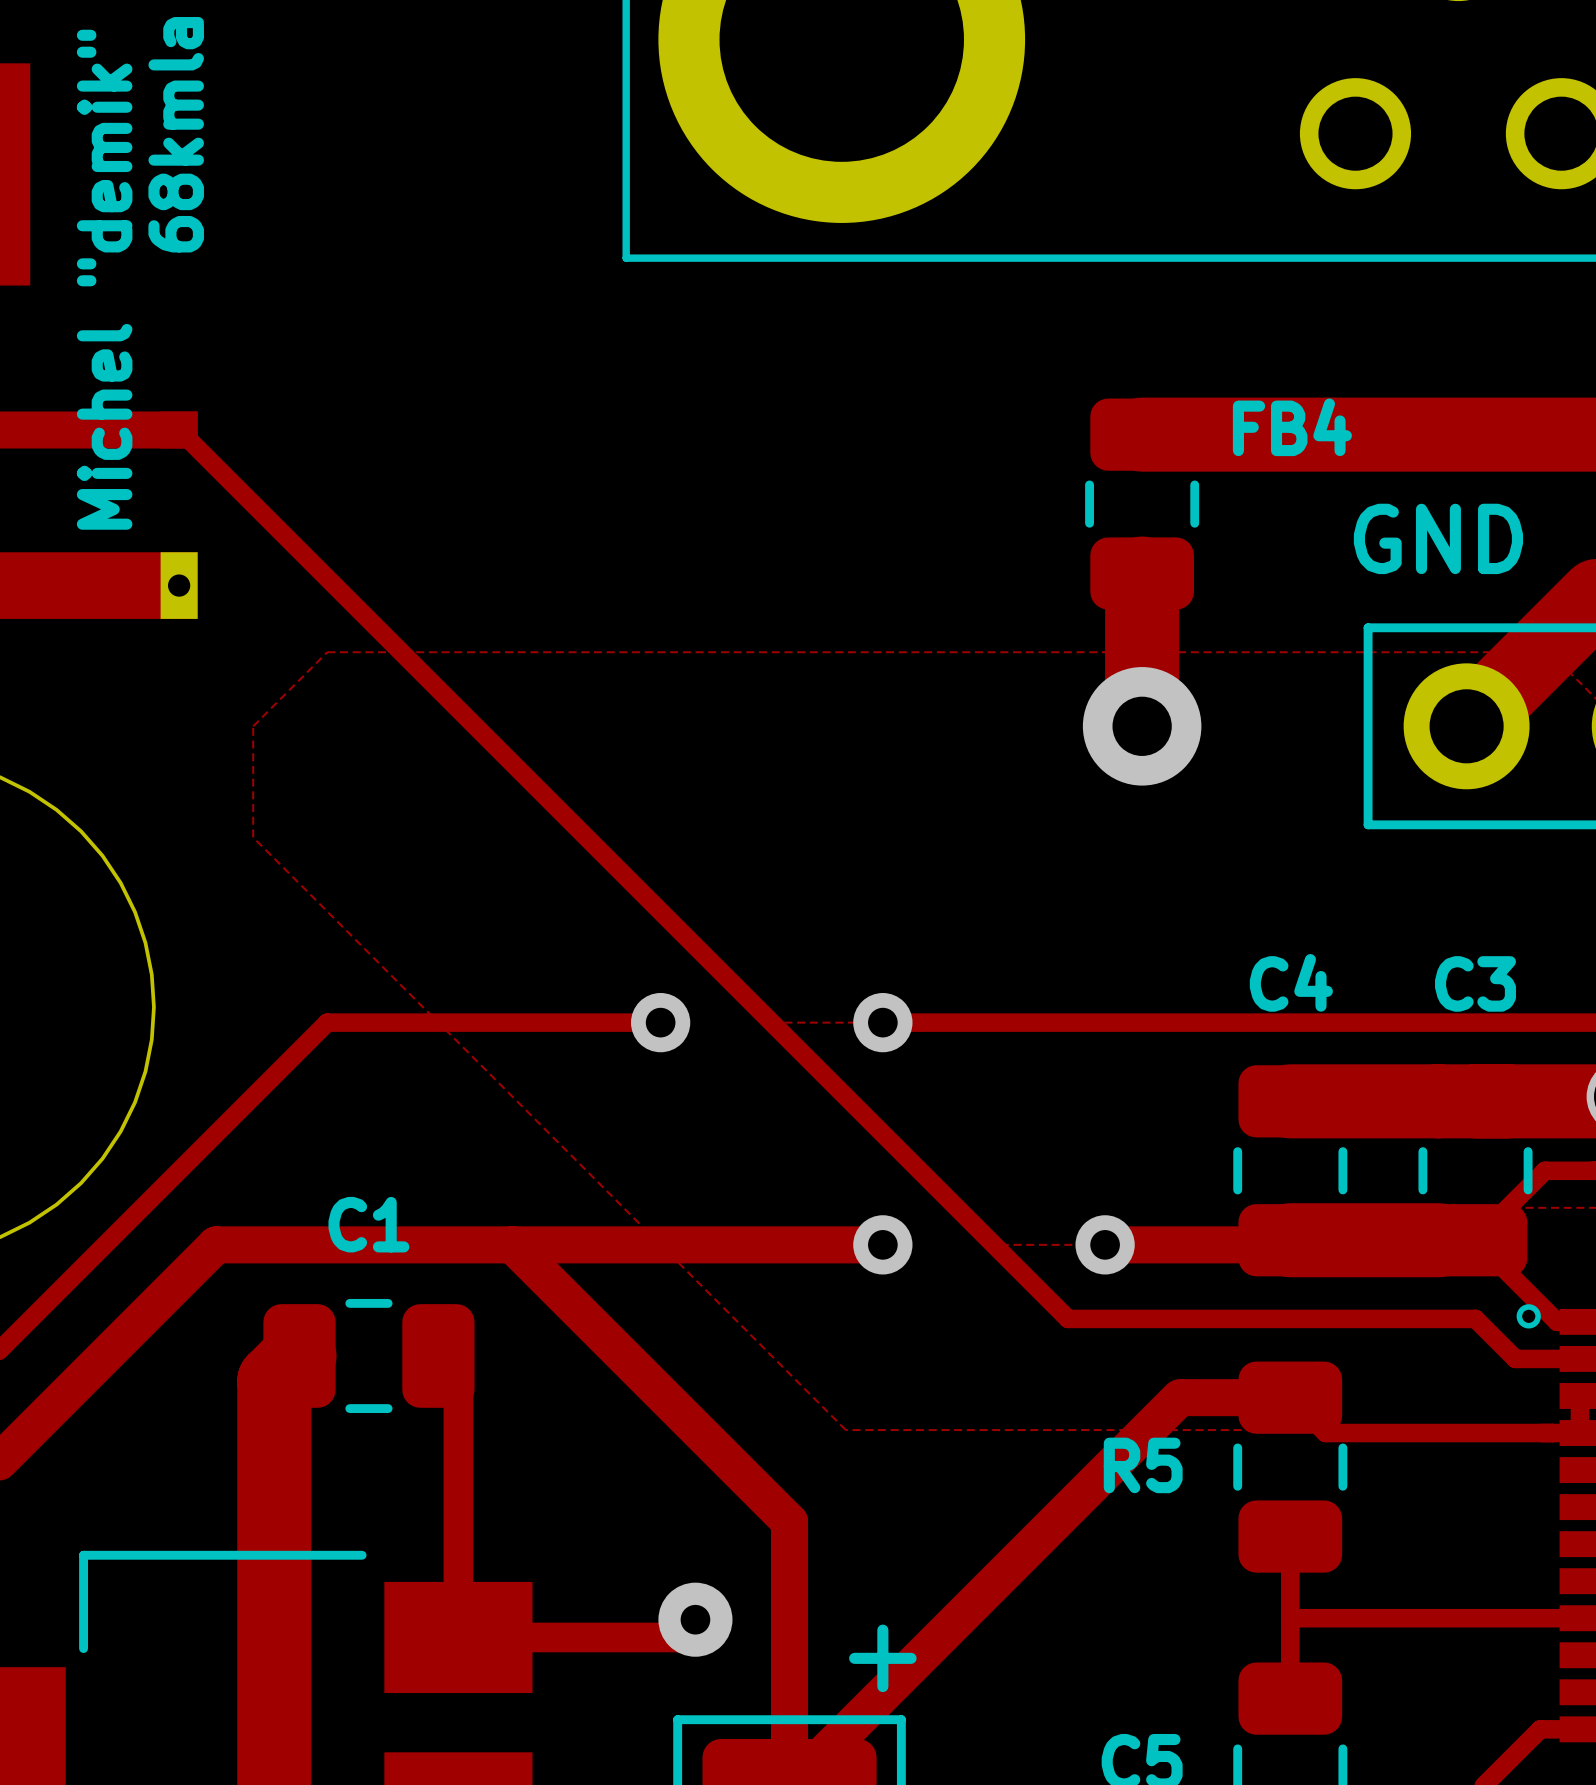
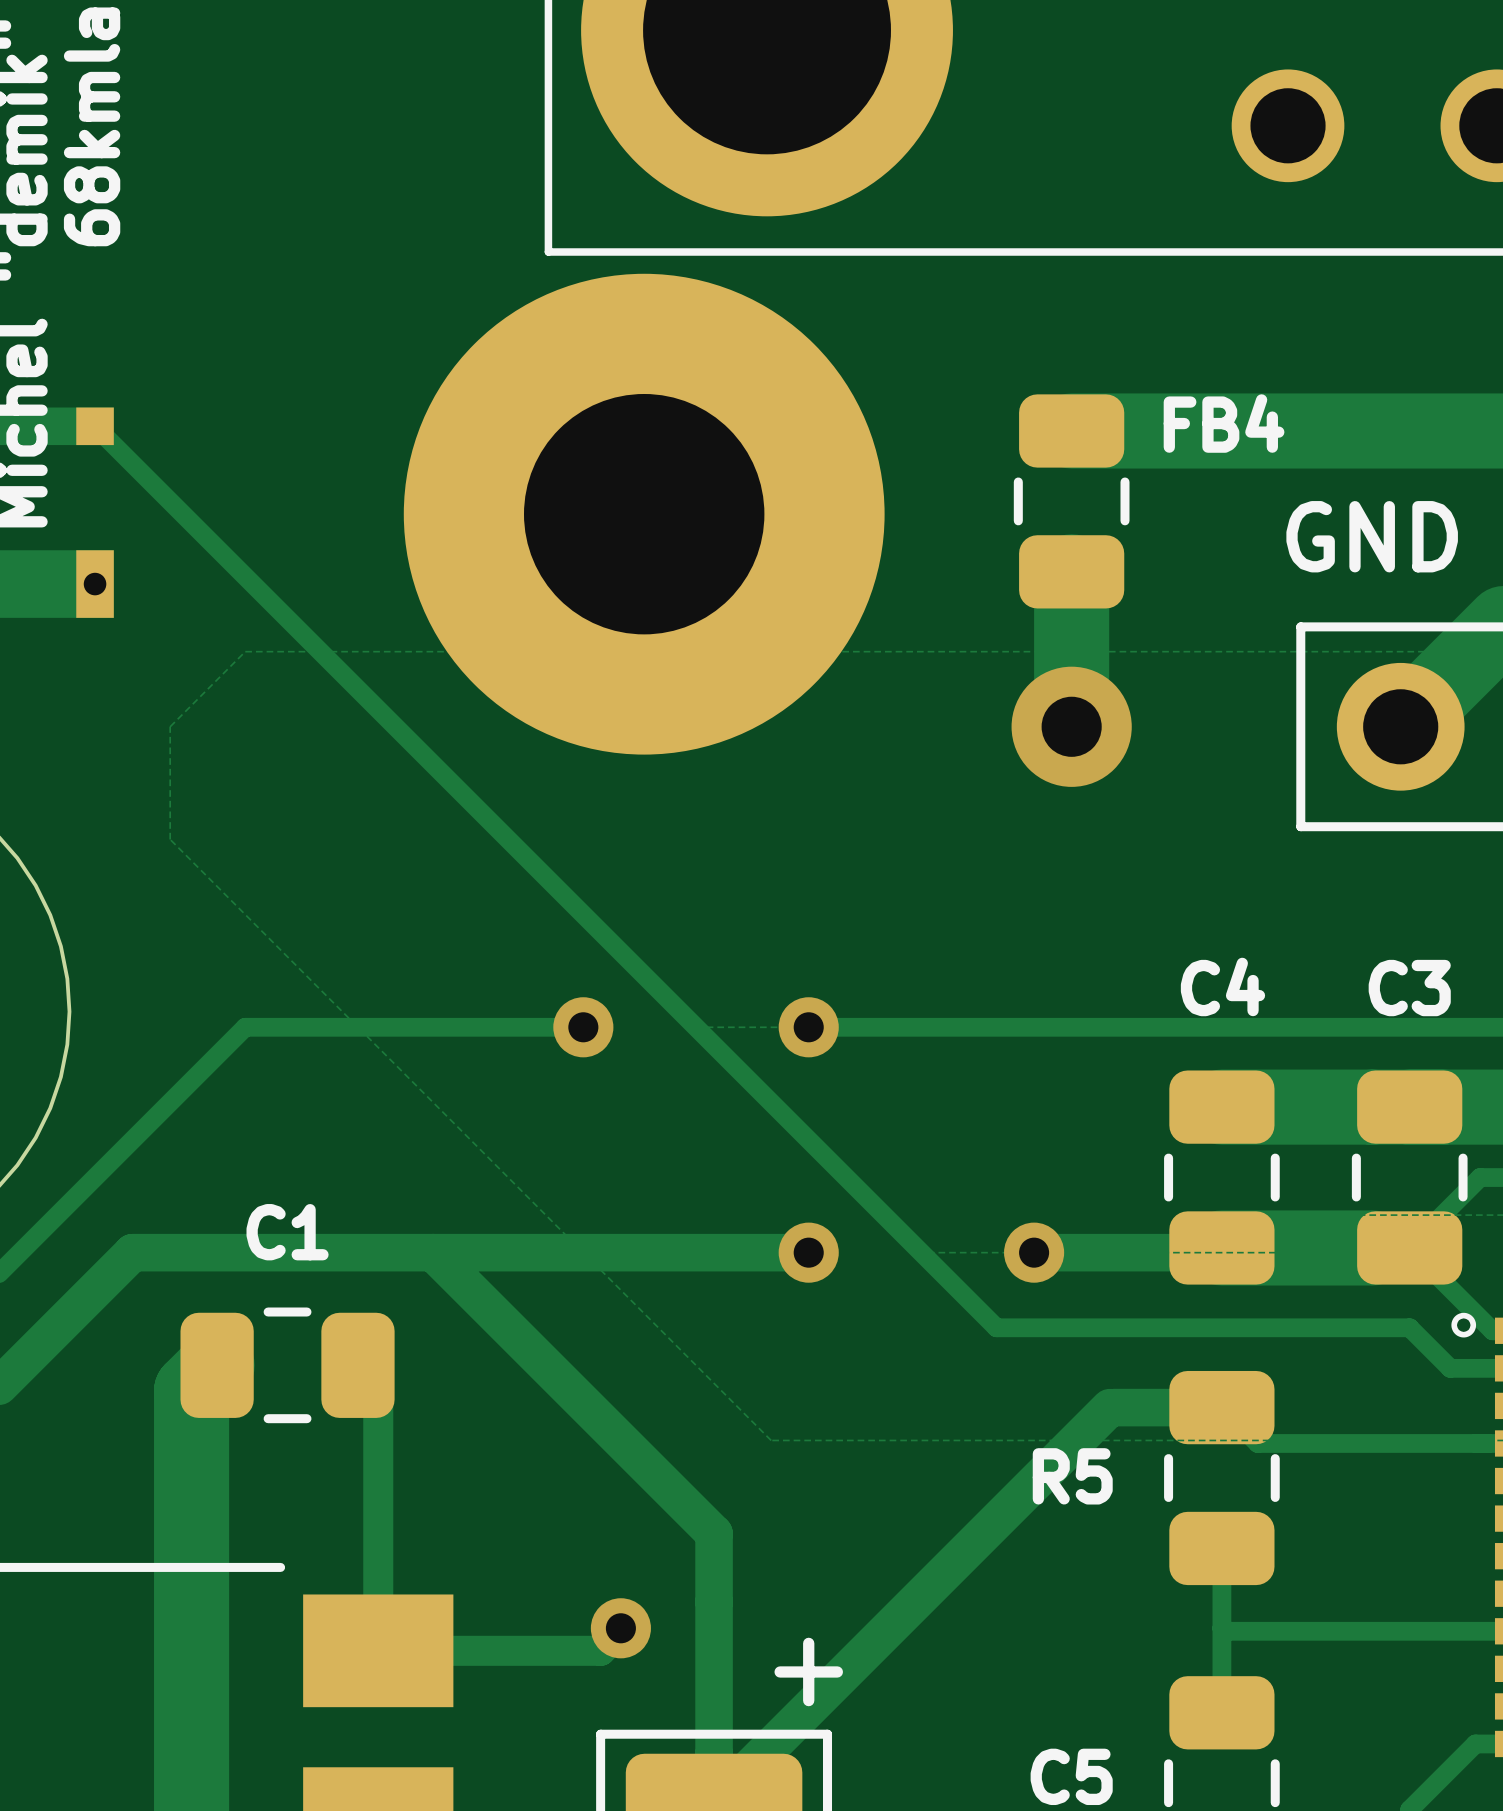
part: none -> (644, 514)
via size: [658, 1582, 733, 1657] -> [590, 1598, 651, 1659]

